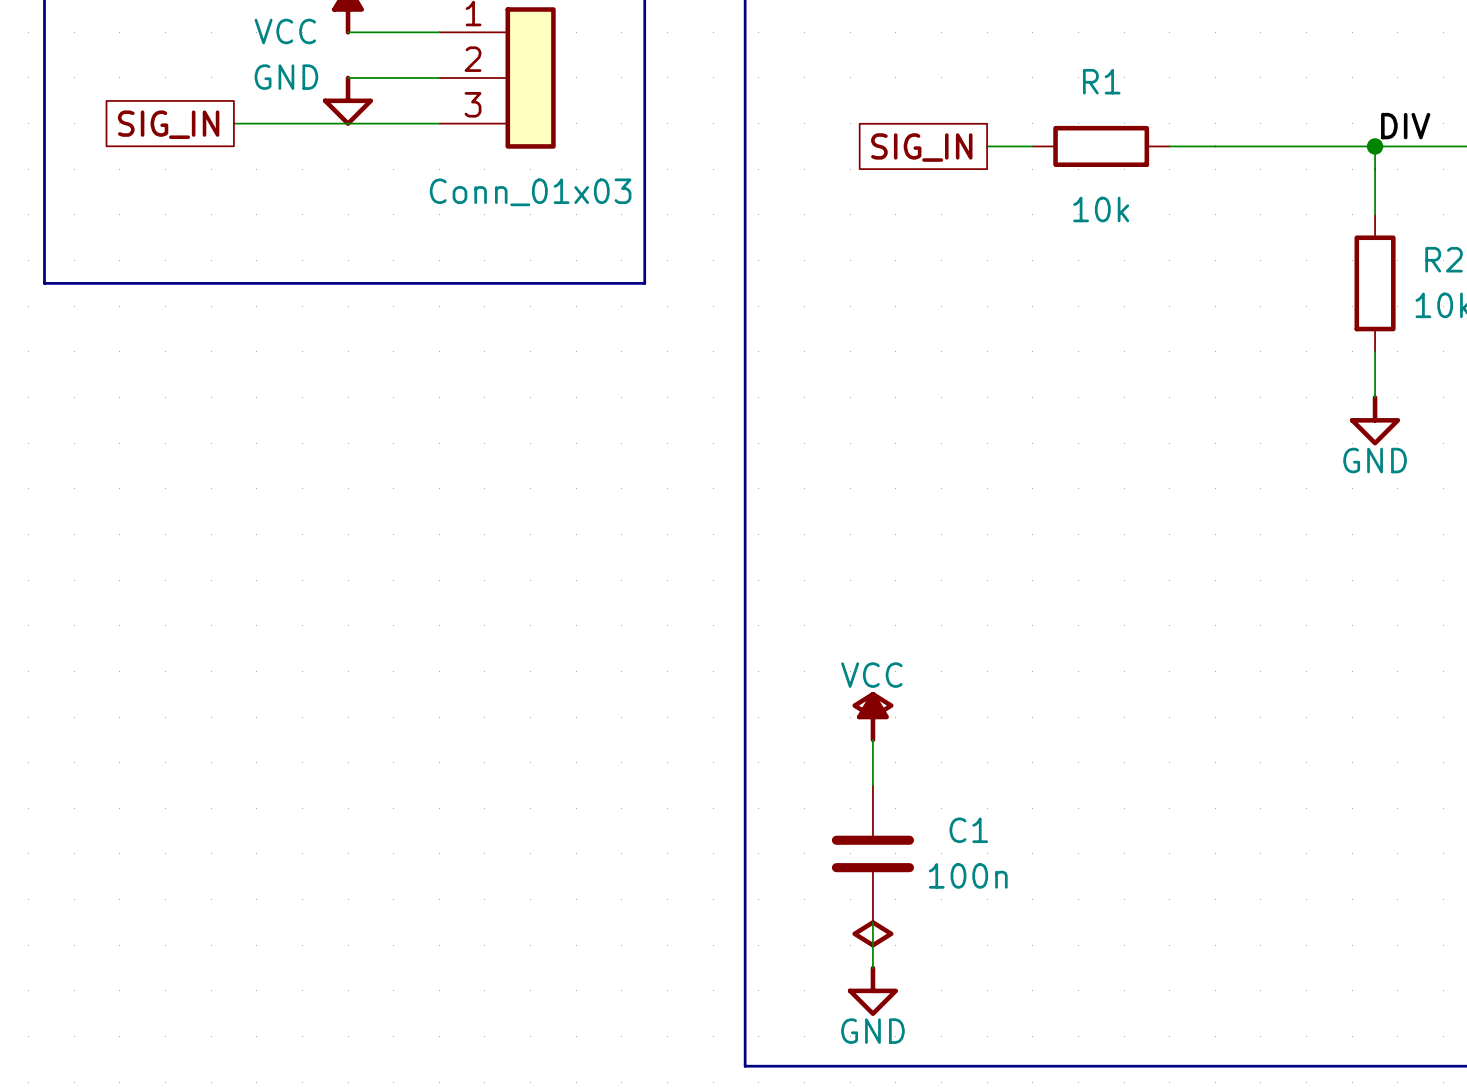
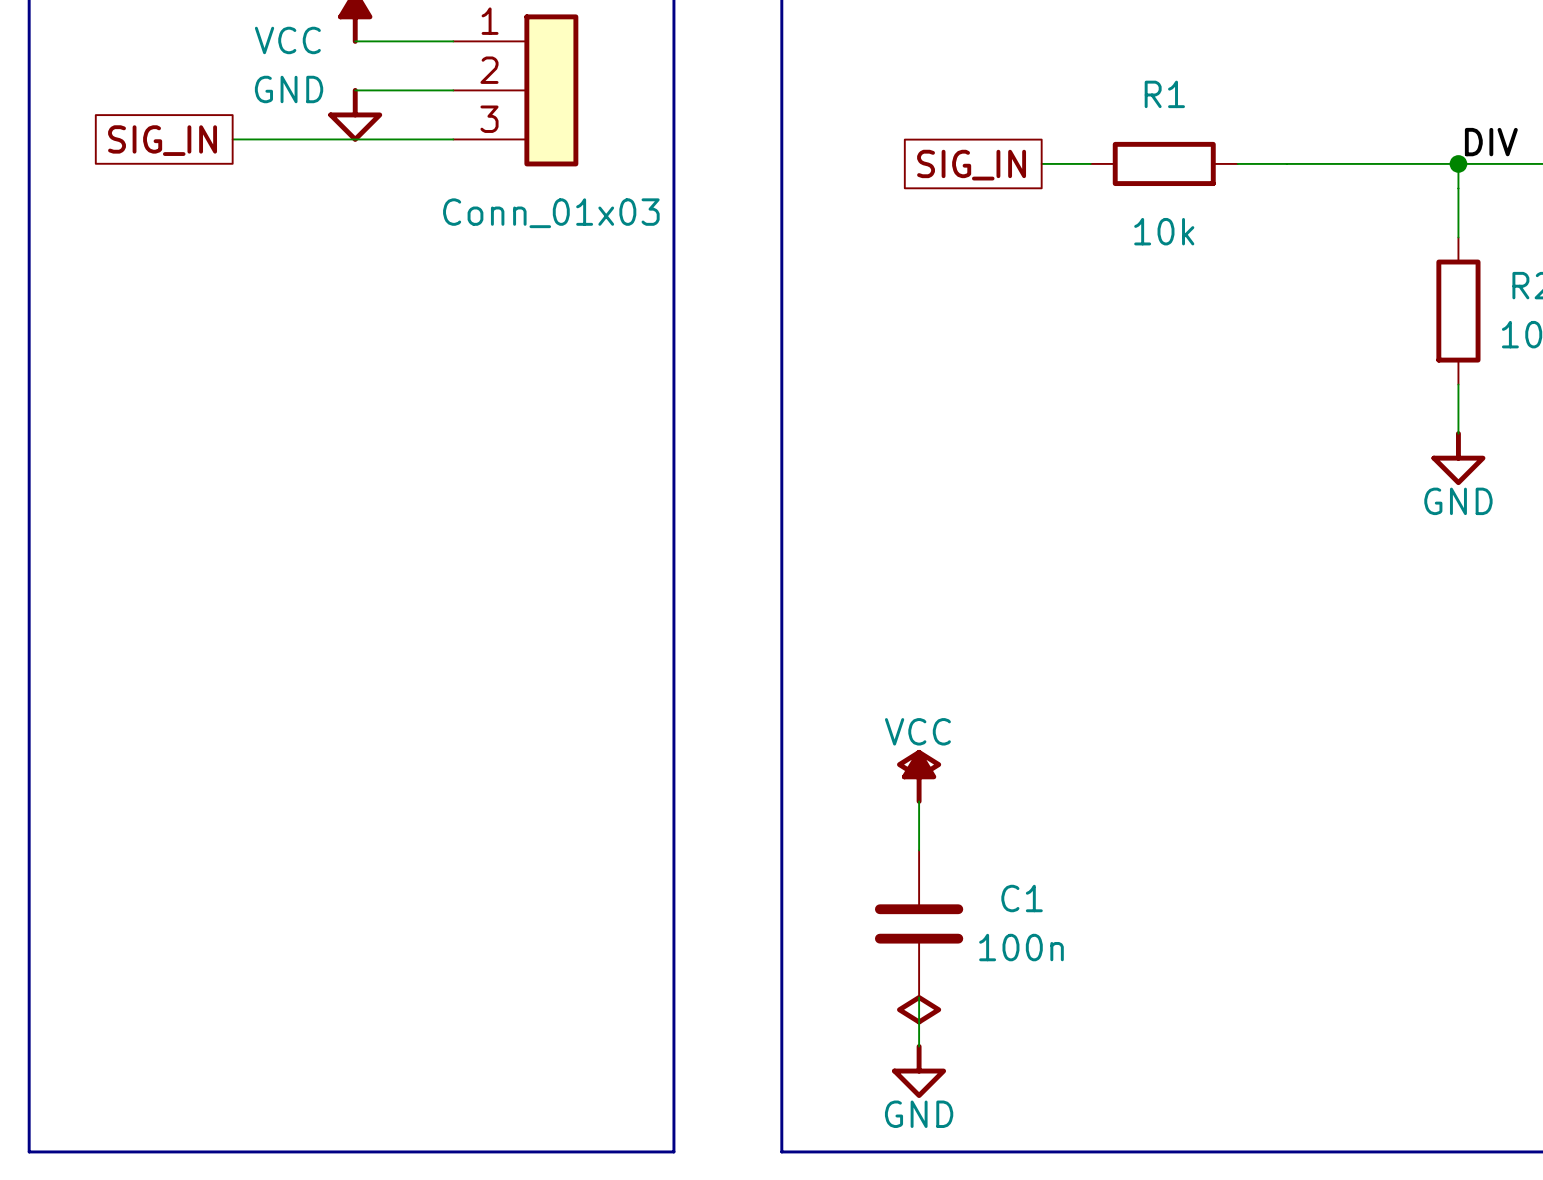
line: (44, 283) (644, 283) -> (29, 311) (29, 1151) (673, 1151) (673, 311)

